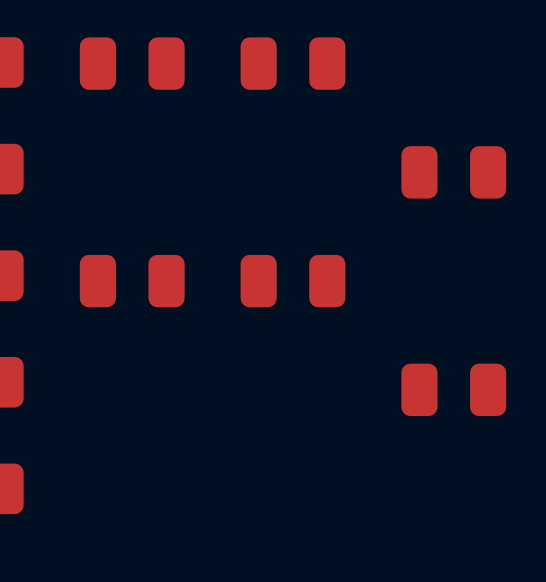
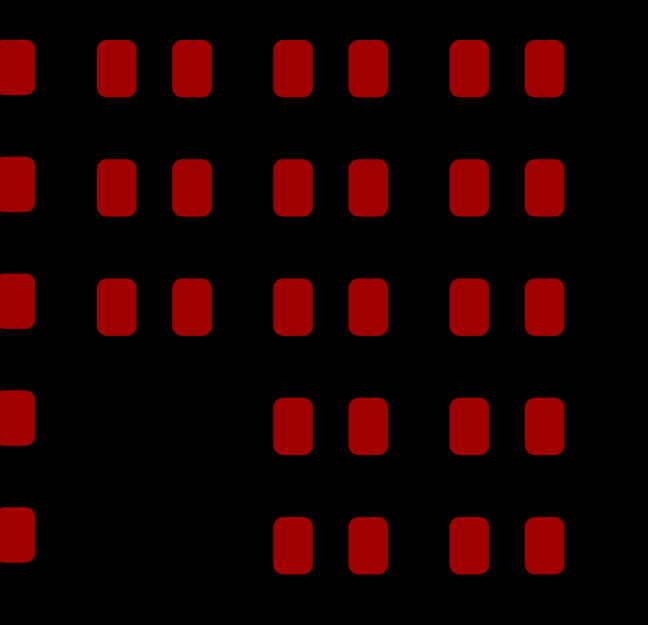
part: none -> (507, 68)
part: none -> (154, 187)
part: none -> (330, 187)
part: none -> (507, 307)
part: none -> (330, 426)
part: none -> (330, 545)
part: none -> (507, 545)

